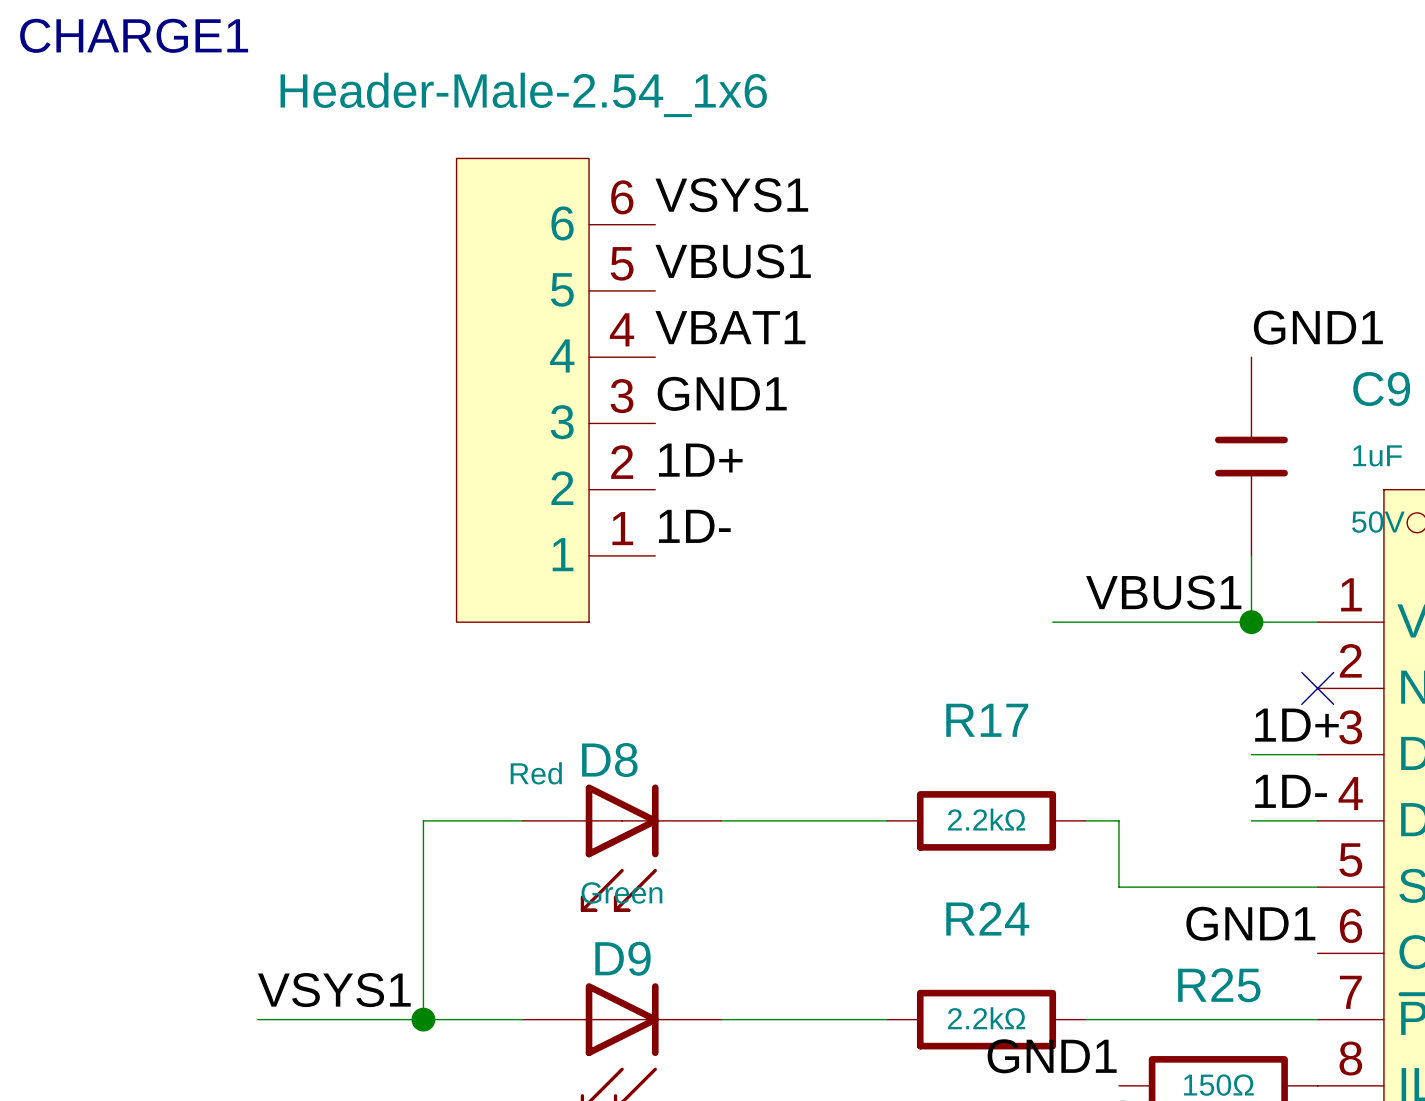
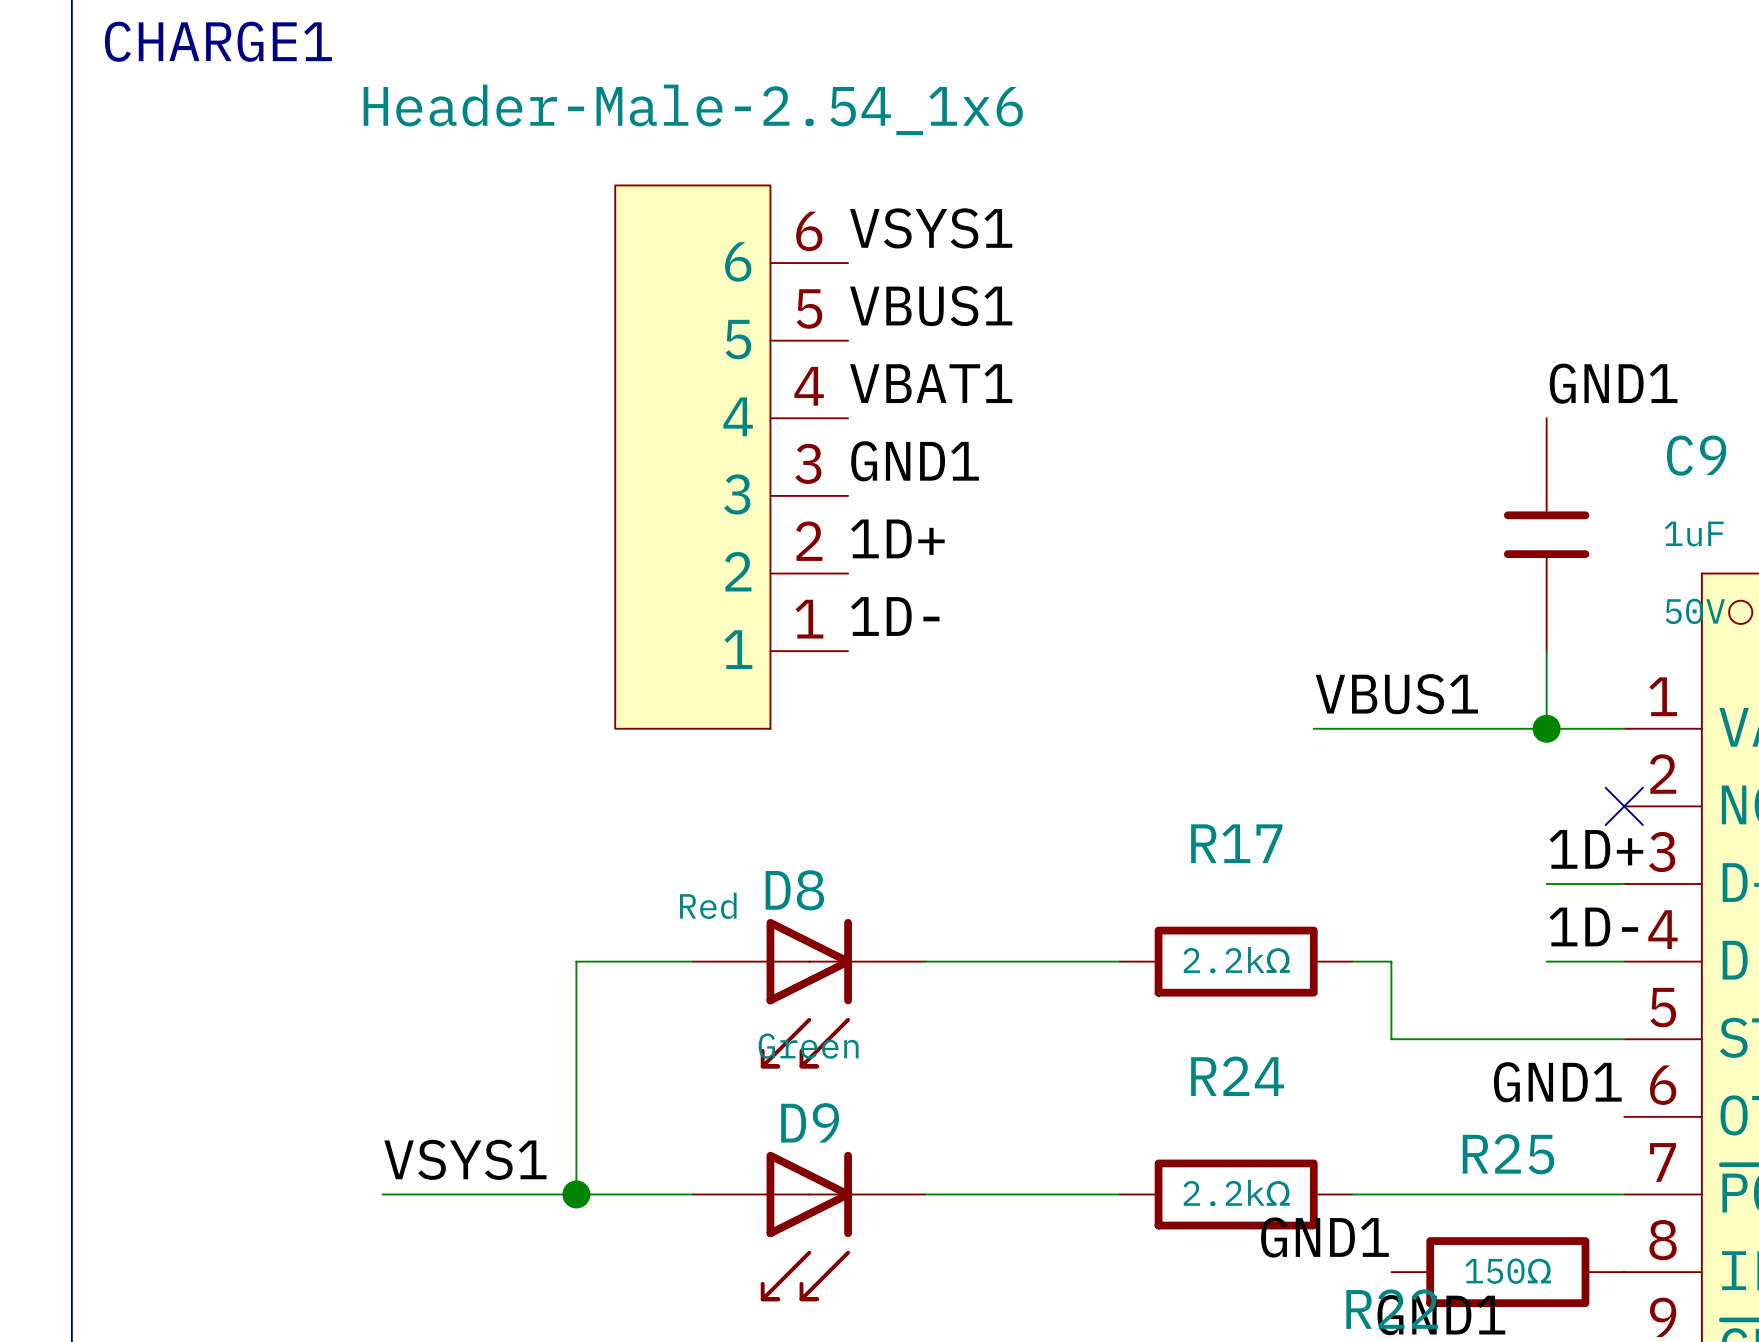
label position: VBUS1 (1163, 592) -> VBUS1 (1396, 694)

